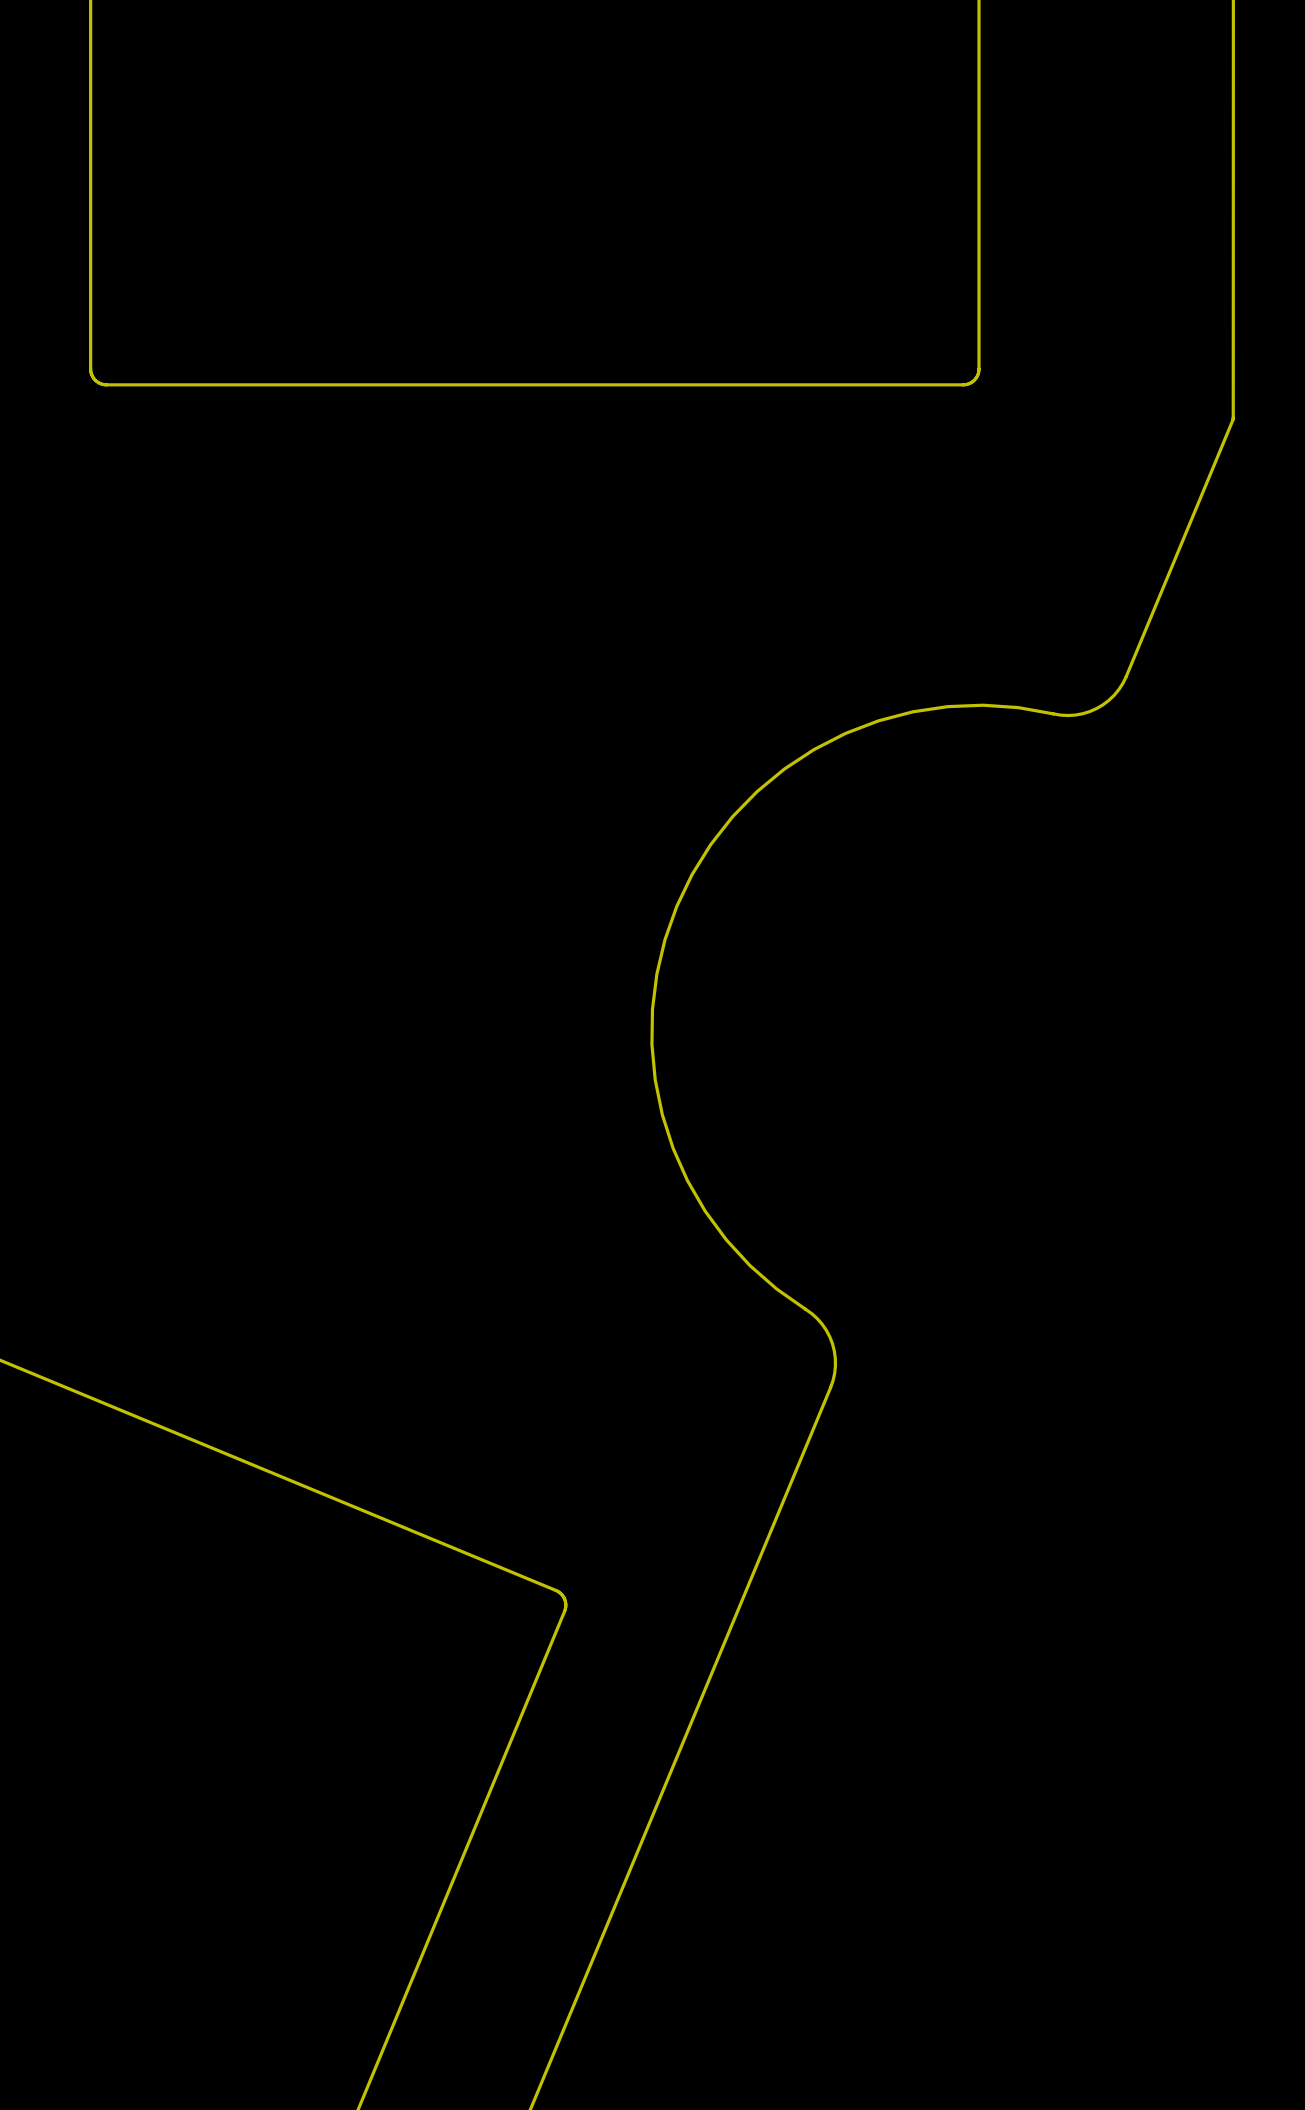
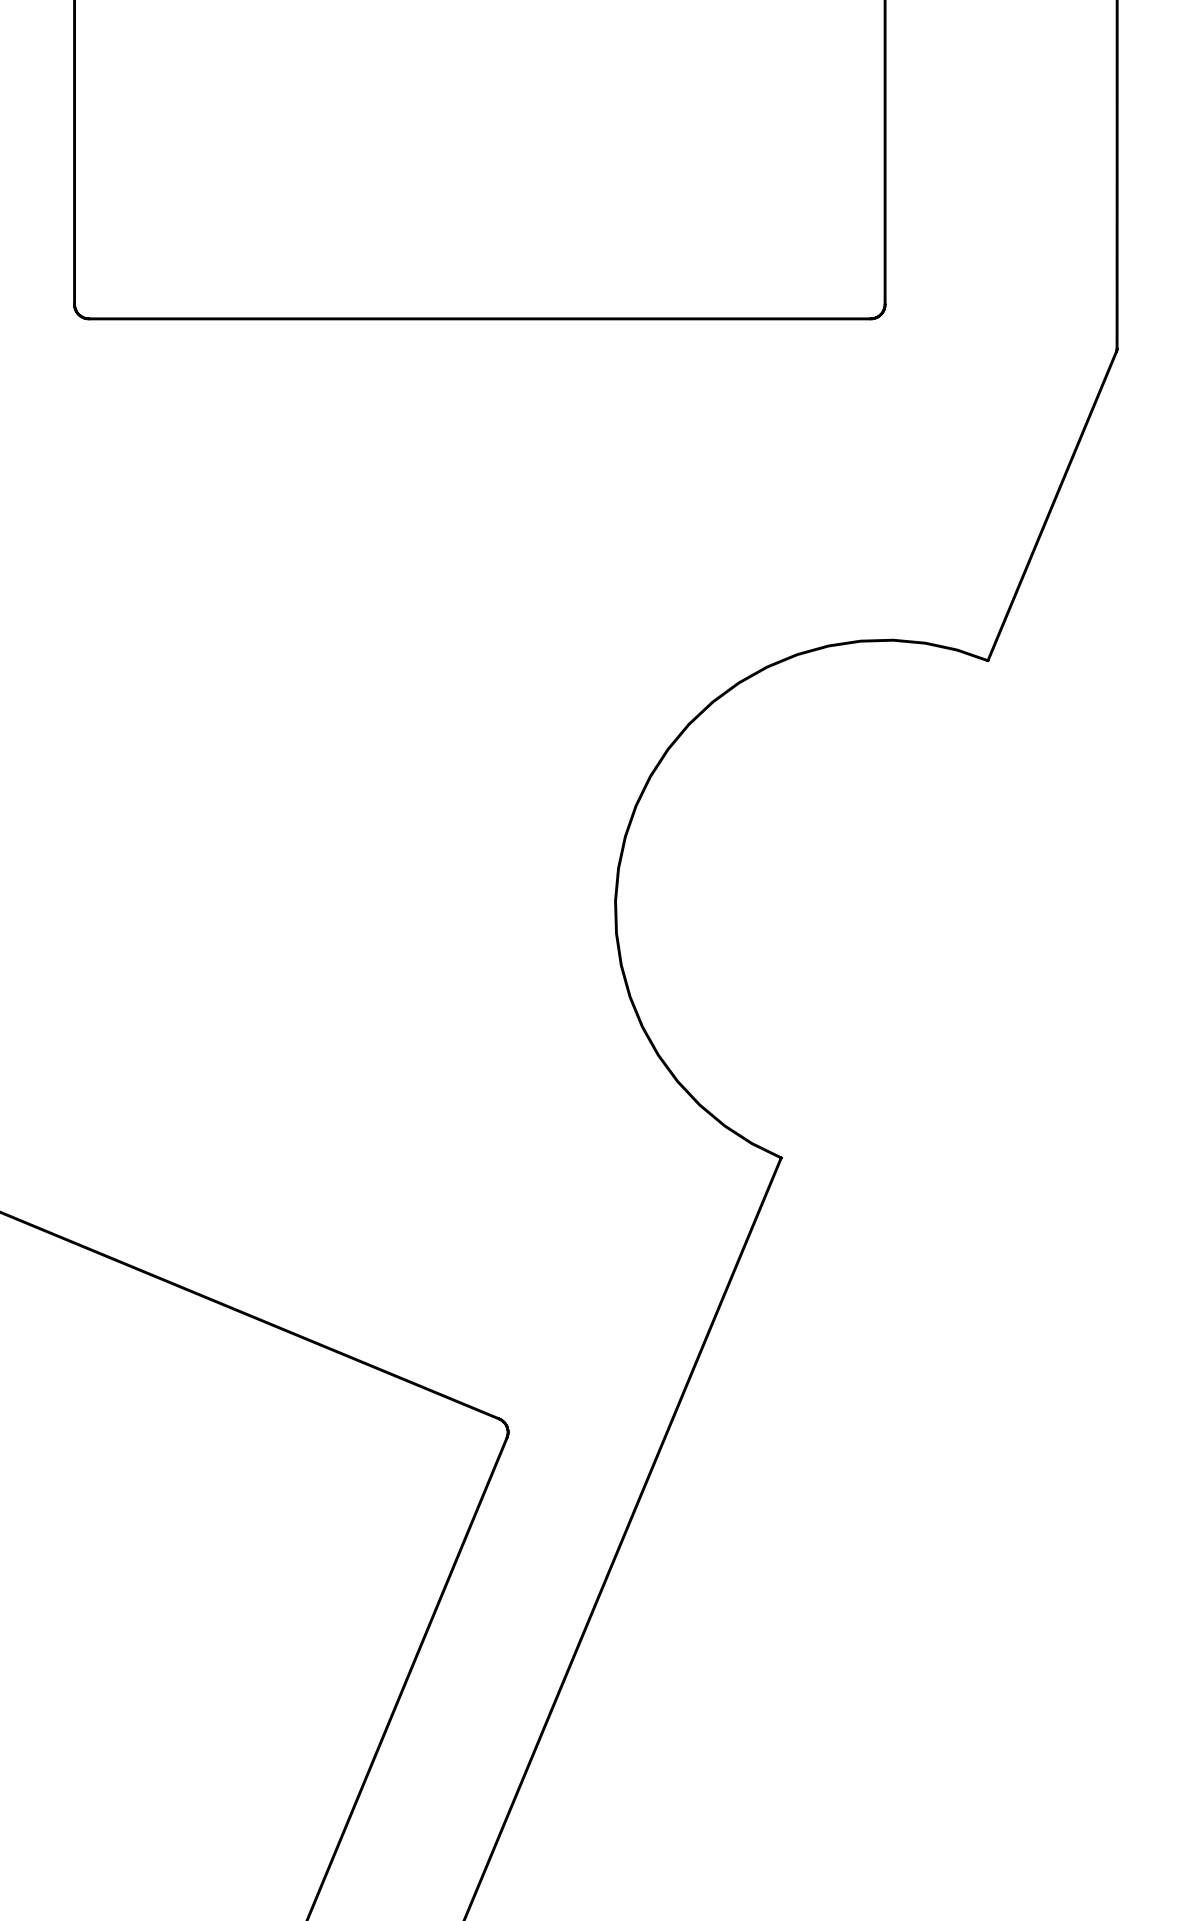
board edge: (1126, 676) (1119, 689) (1108, 700) (1096, 708) (1082, 713) (1060, 715) (1018, 707) (983, 705) (947, 706) (912, 711) (878, 720) (845, 733) (814, 749) (784, 768) (757, 791) (732, 816) (710, 844) (692, 874) (676, 906) (664, 939) (656, 974) (652, 1009) (651, 1044) (655, 1079) (662, 1114) (673, 1148) (687, 1180) (705, 1211) (726, 1239) (750, 1265) (776, 1288) (811, 1313) (826, 1330) (832, 1343) (835, 1358) (834, 1373) (830, 1387) -> (1019, 584) (987, 660) (957, 650) (925, 643) (893, 640) (860, 641) (828, 646) (797, 654) (767, 667) (738, 683) (712, 702) (688, 724) (668, 749) (650, 776) (636, 805) (625, 836) (618, 868) (615, 900) (616, 933) (621, 965) (630, 996) (642, 1026) (658, 1055) (677, 1081) (699, 1105) (724, 1125) (752, 1143) (781, 1157) (749, 1233)

